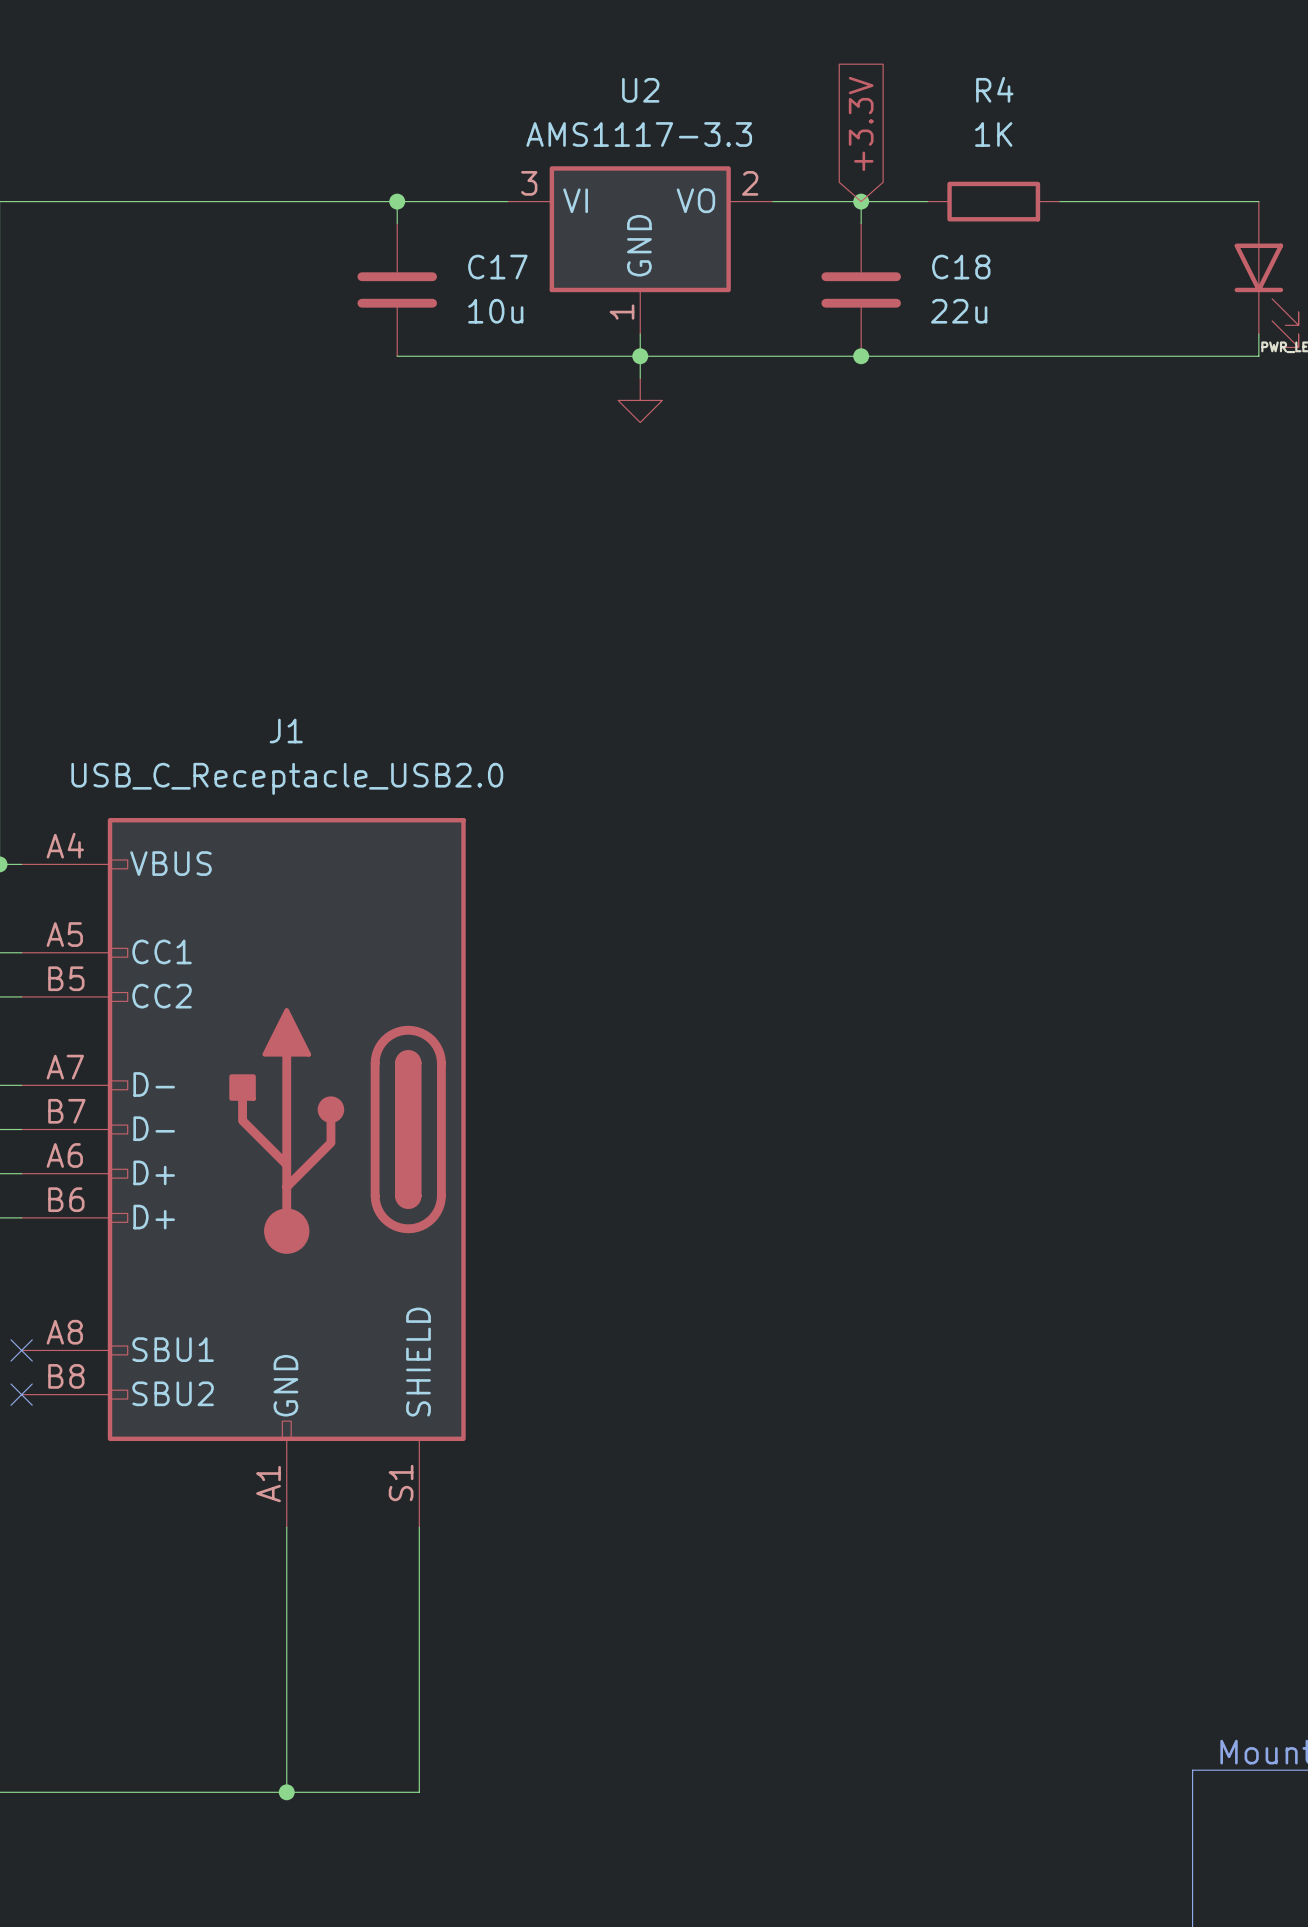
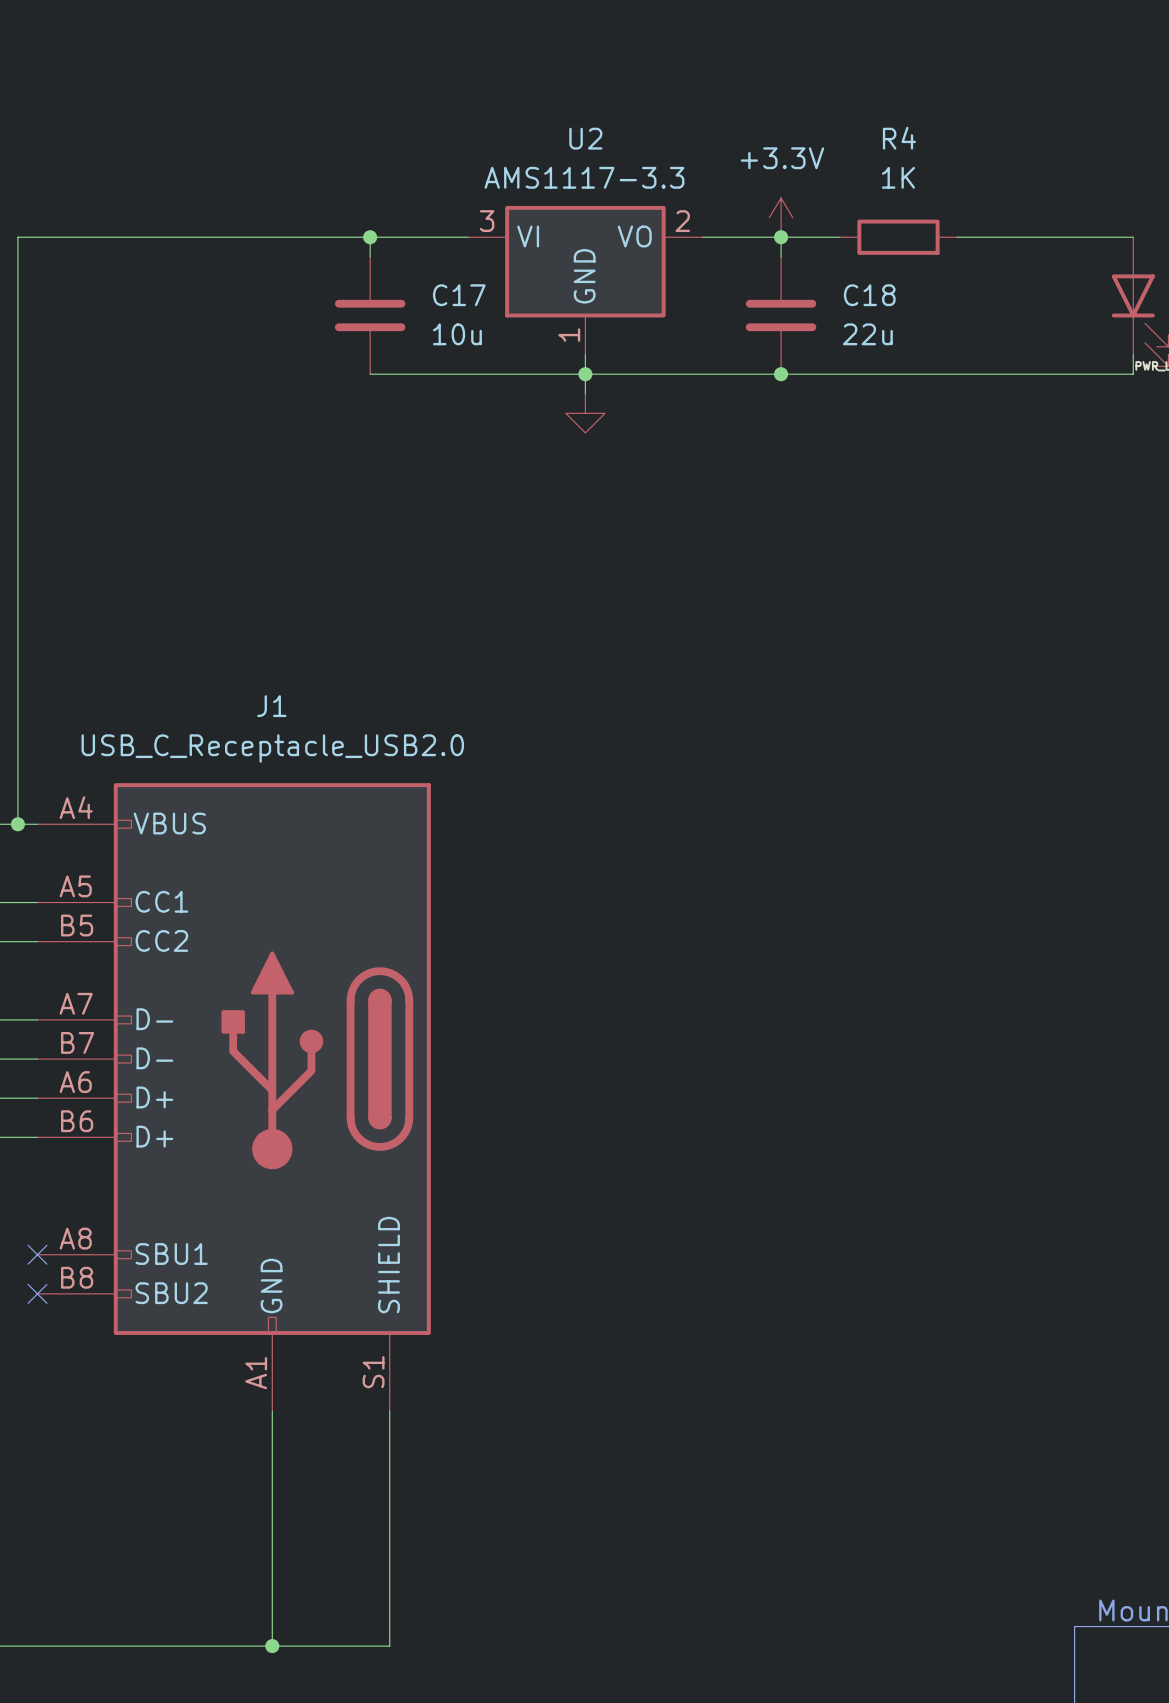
global label: +3.3V (861, 123) -> none
power symbol: none -> +3.3V (781, 217)

